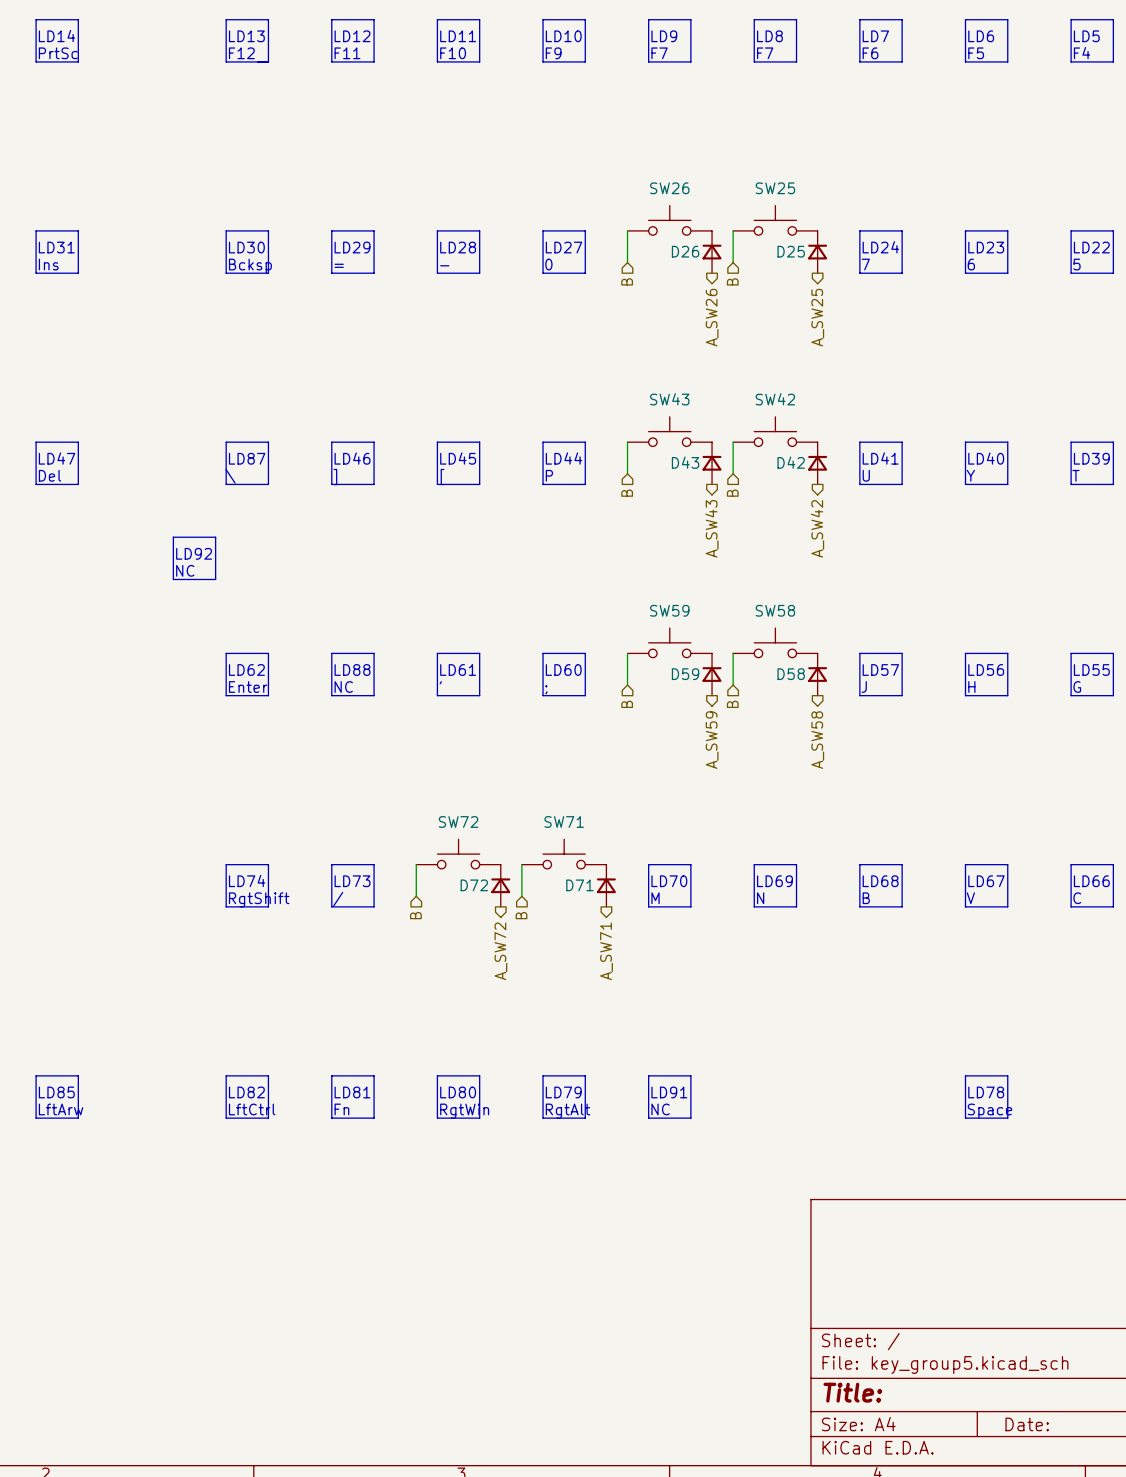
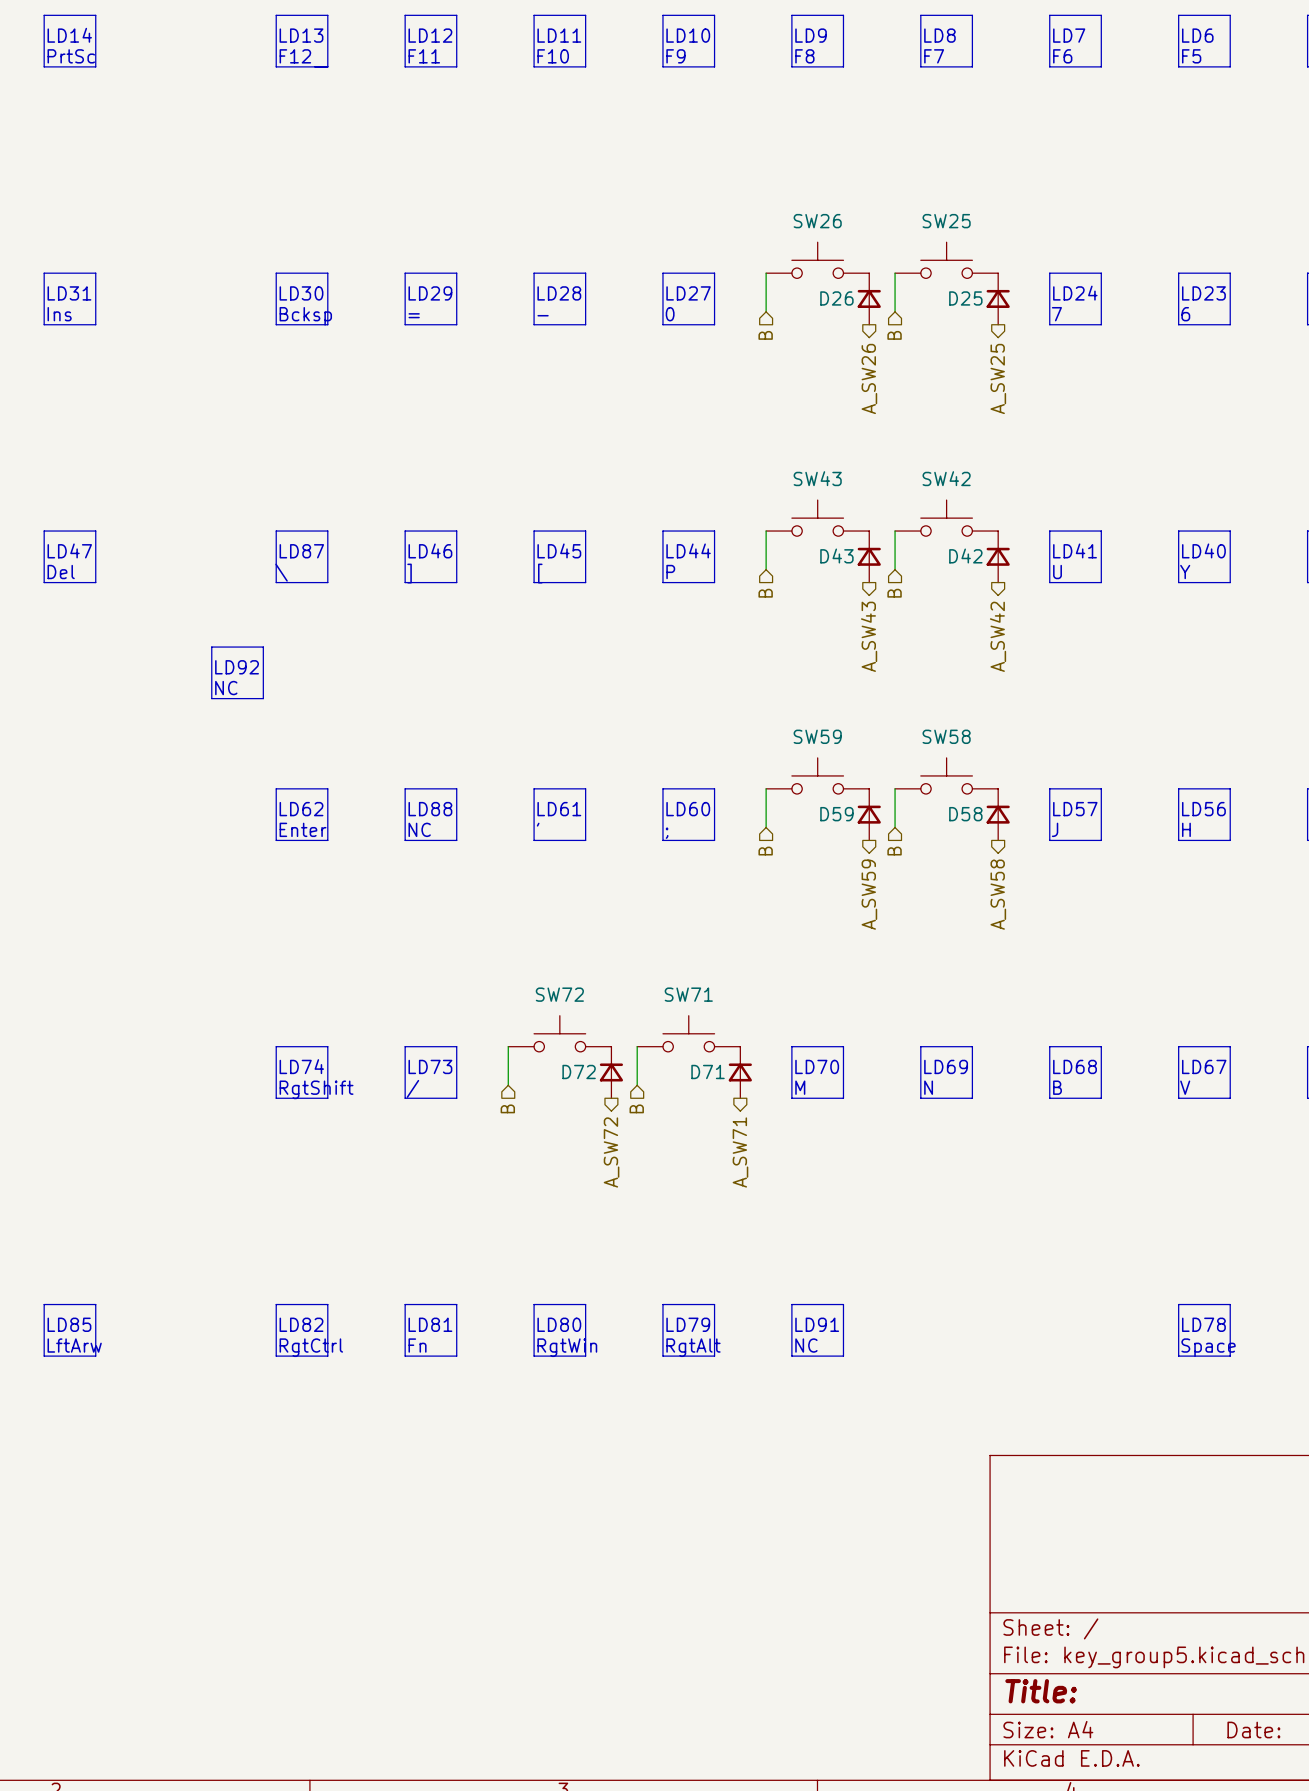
text: F7 (659, 53) -> F8 (804, 56)
text: LftCtrl (252, 1109) -> RgtCtrl (311, 1347)

